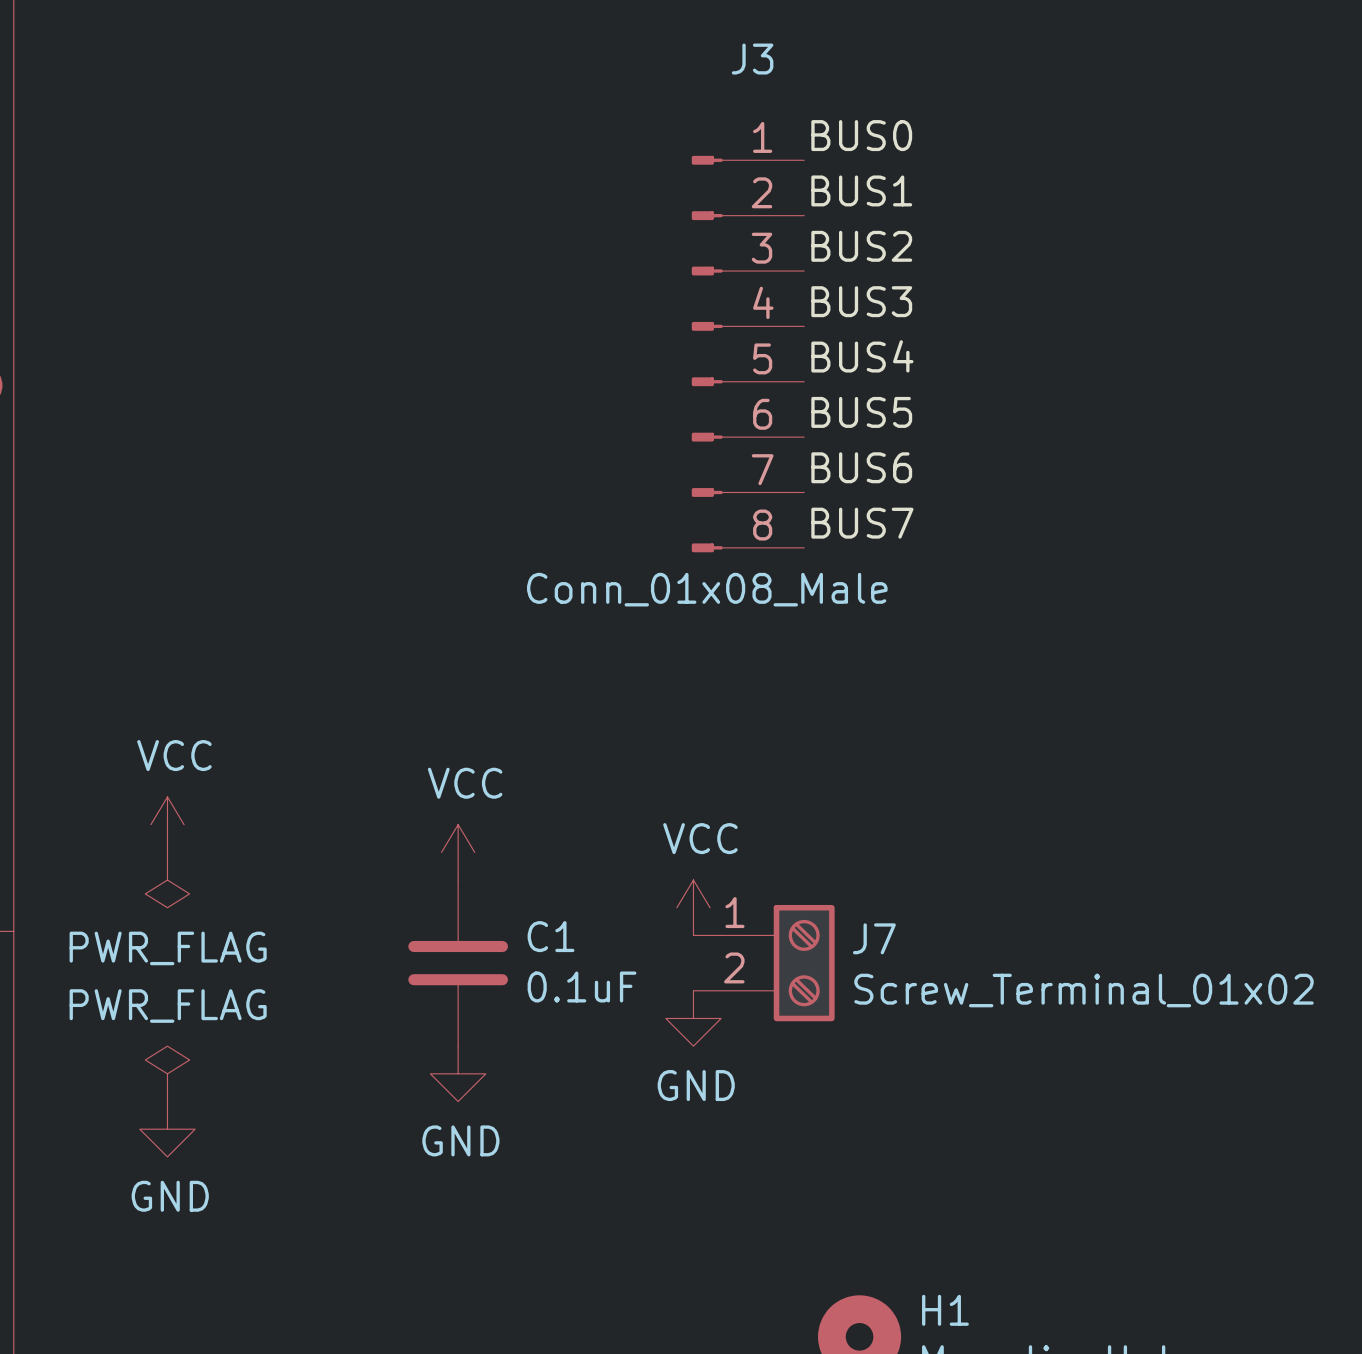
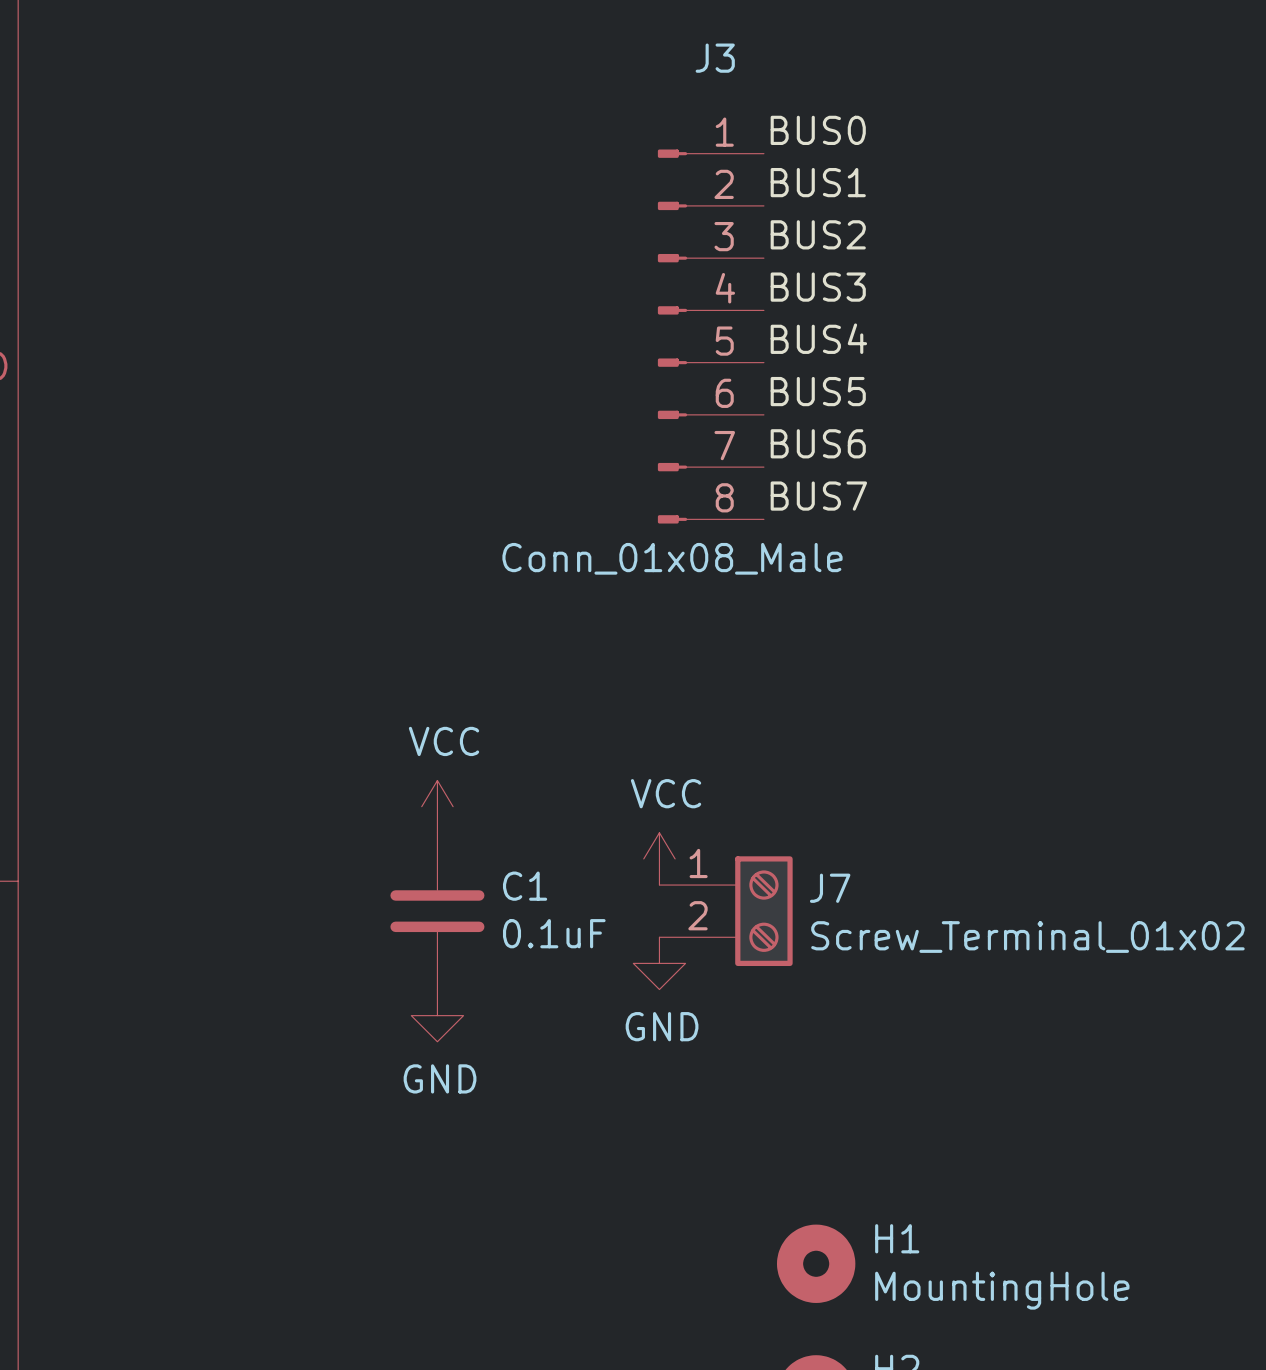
power symbol: VCC (167, 824) -> none
power symbol: PWR_FLAG (167, 880) -> none
power symbol: PWR_FLAG (167, 1073) -> none
power symbol: GND (167, 1129) -> none

